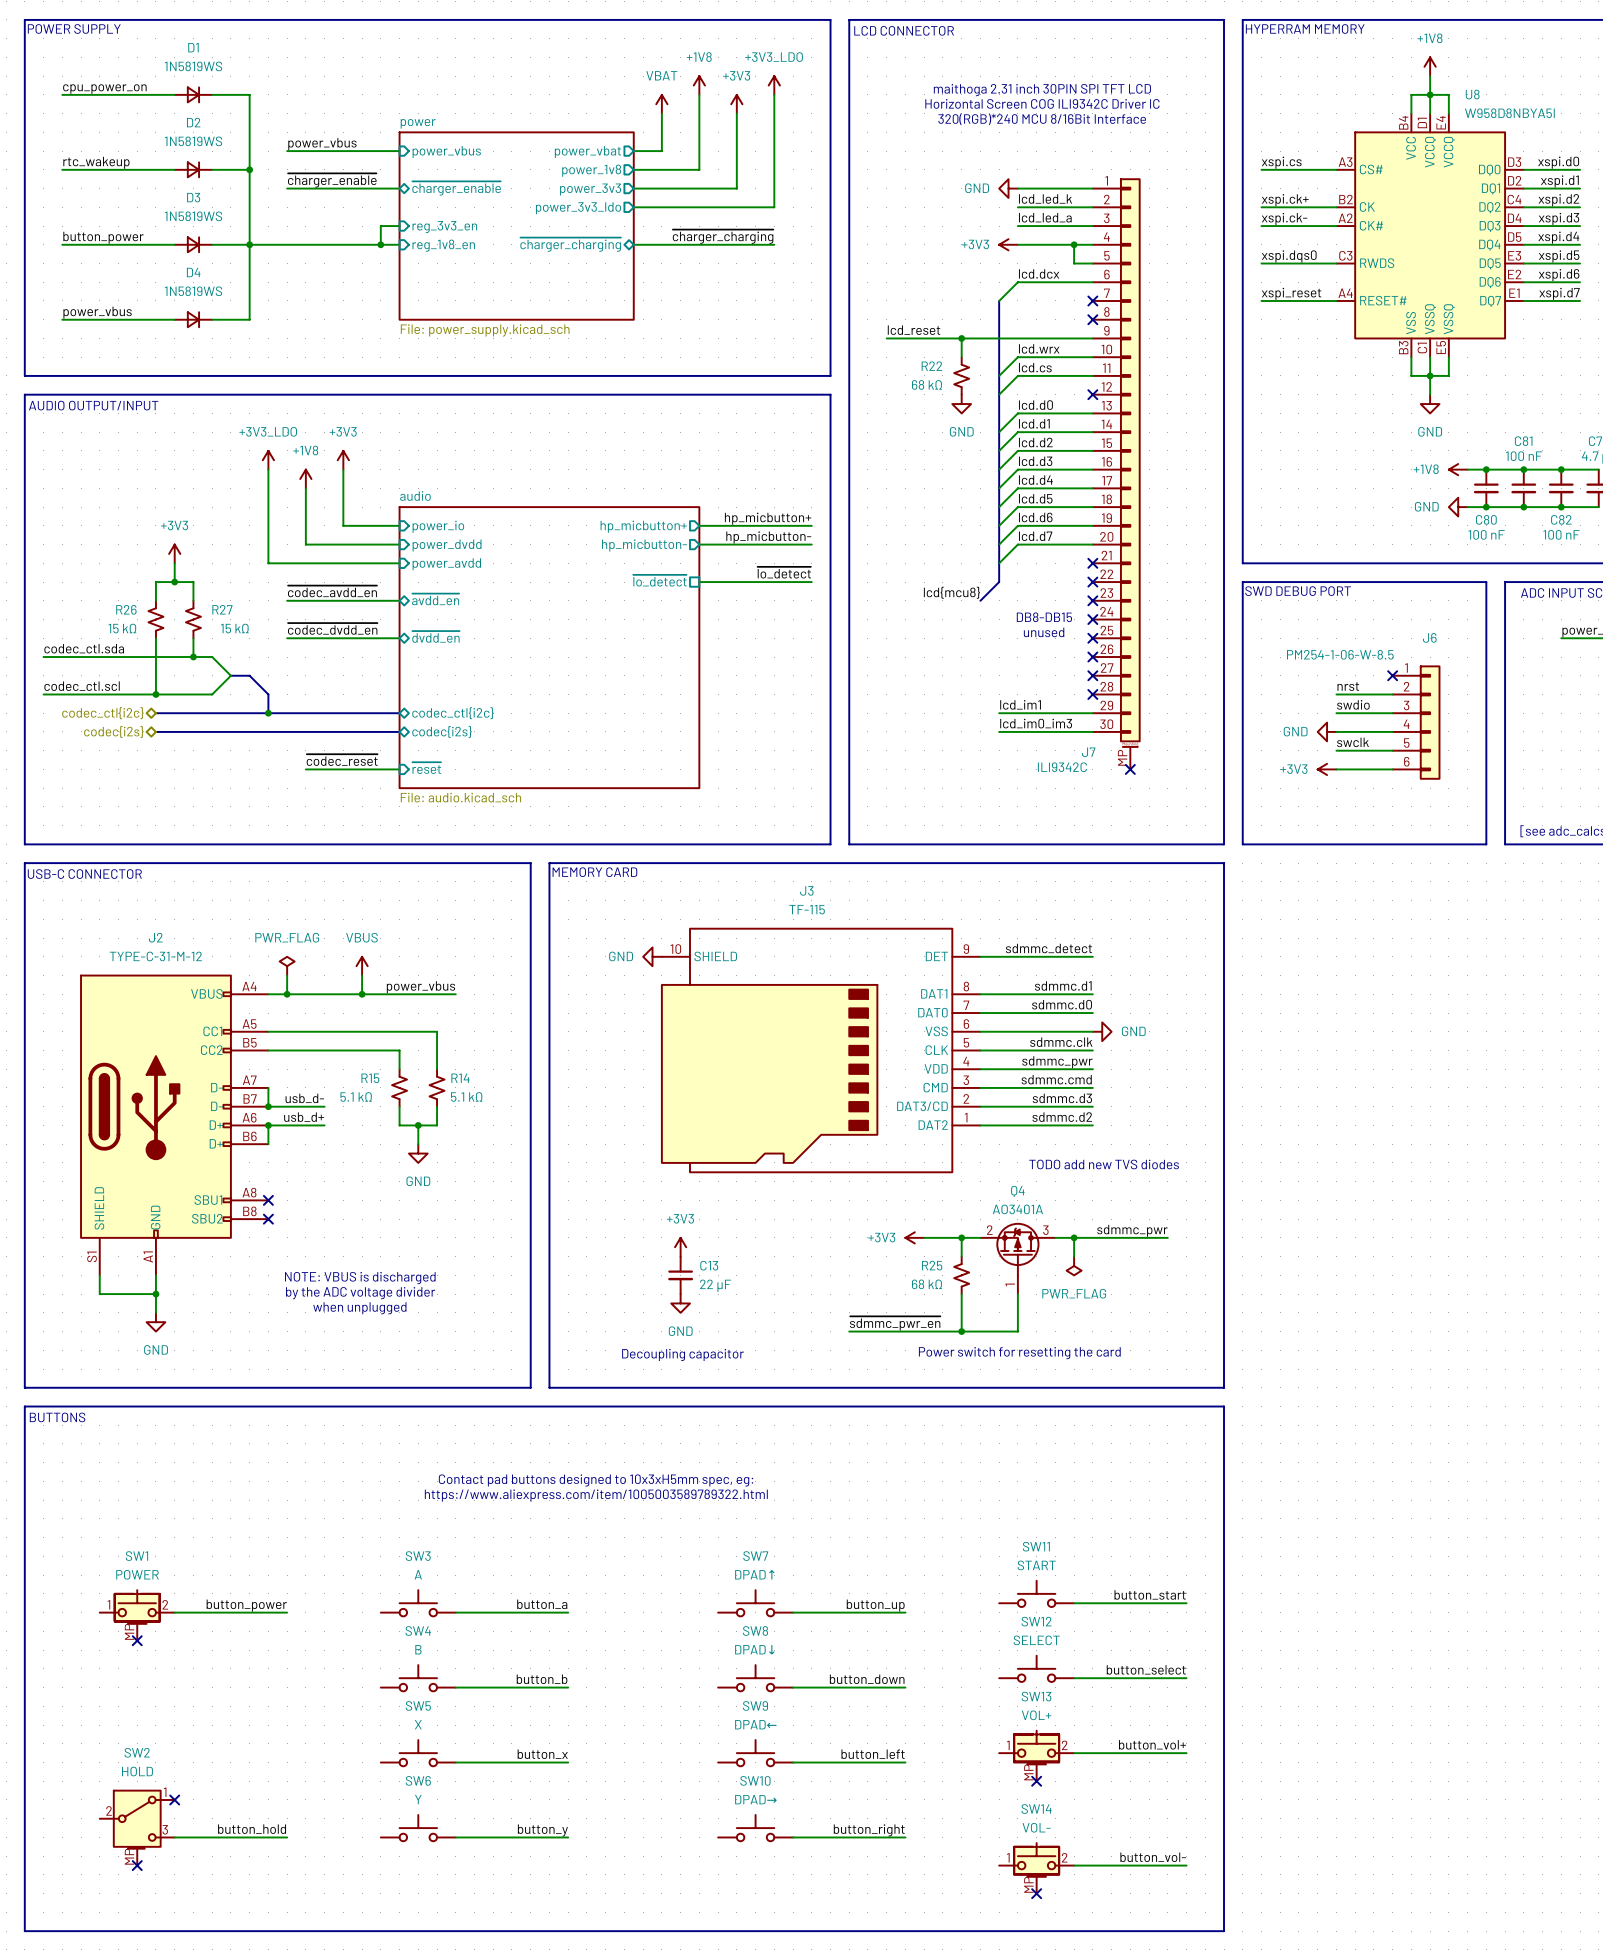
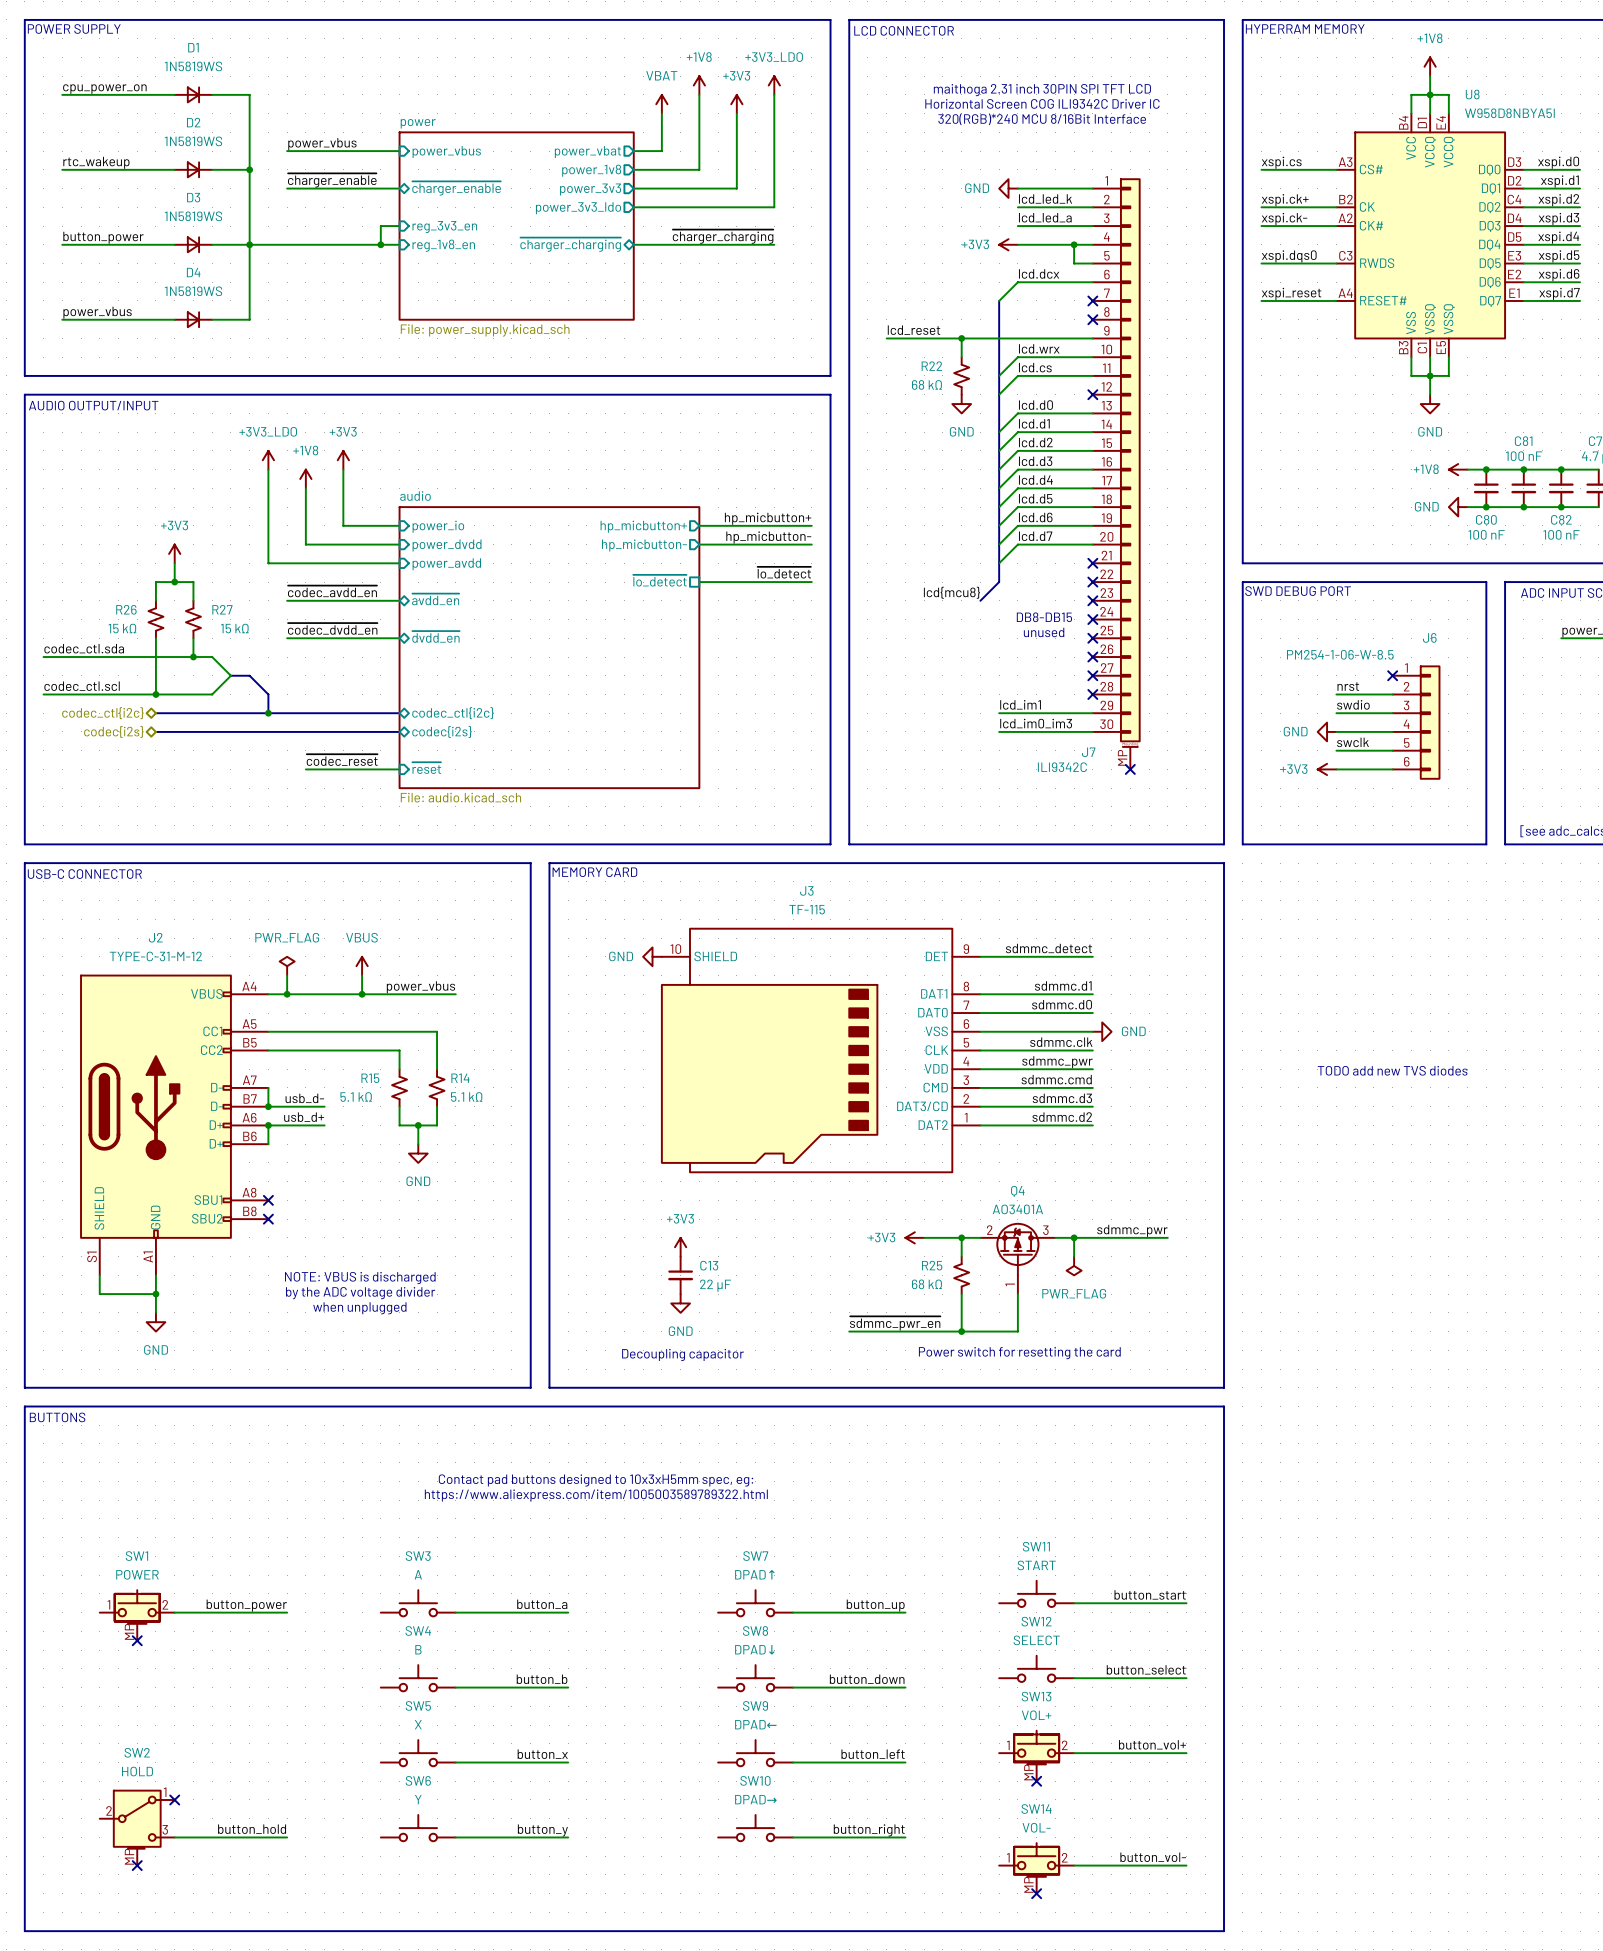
text: none -> TODO add new TVS diodes (1392, 1070)
text: TODO add new TVS diodes (1104, 1164) -> none

